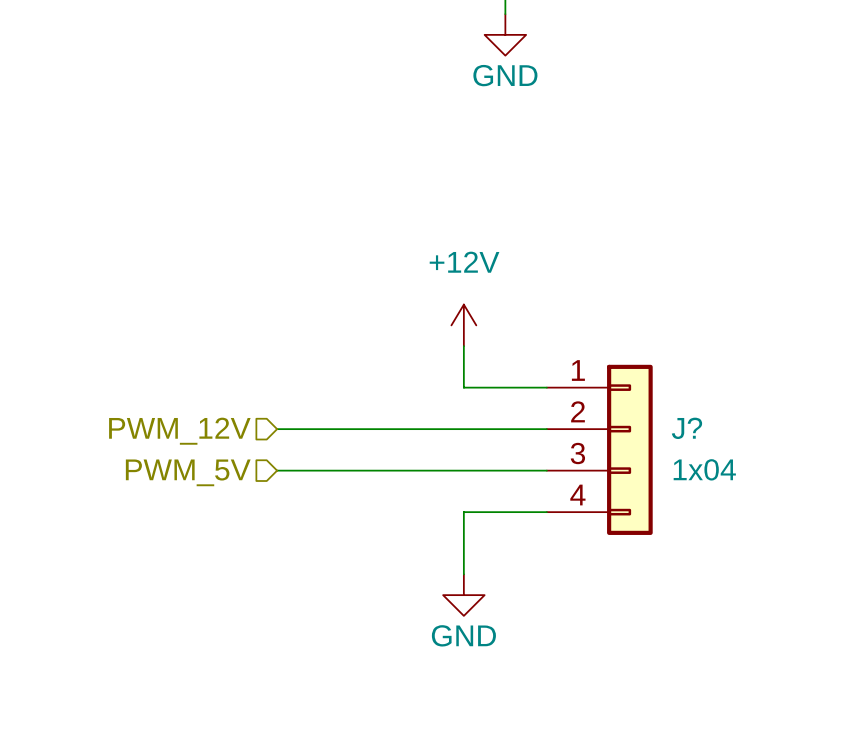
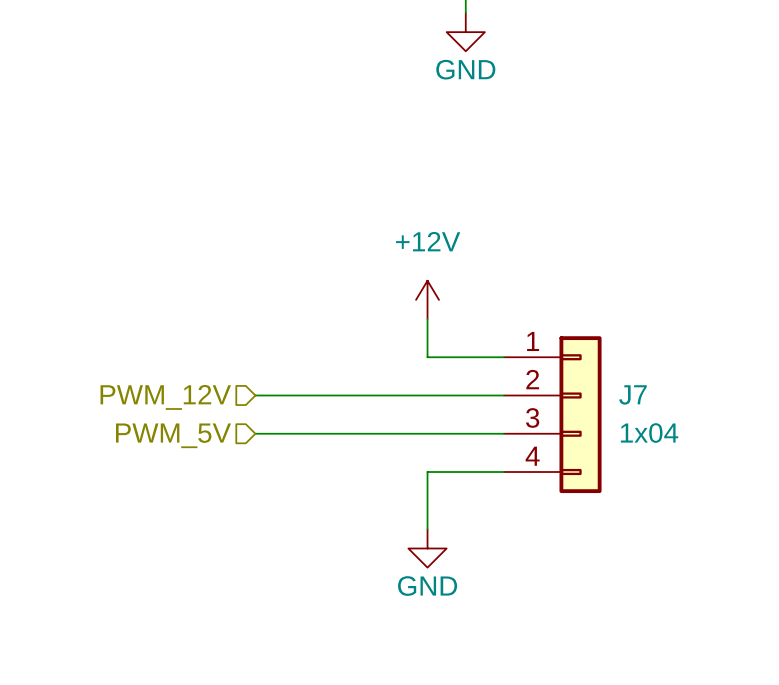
J? name: J? (686, 428) -> J7 (632, 394)

